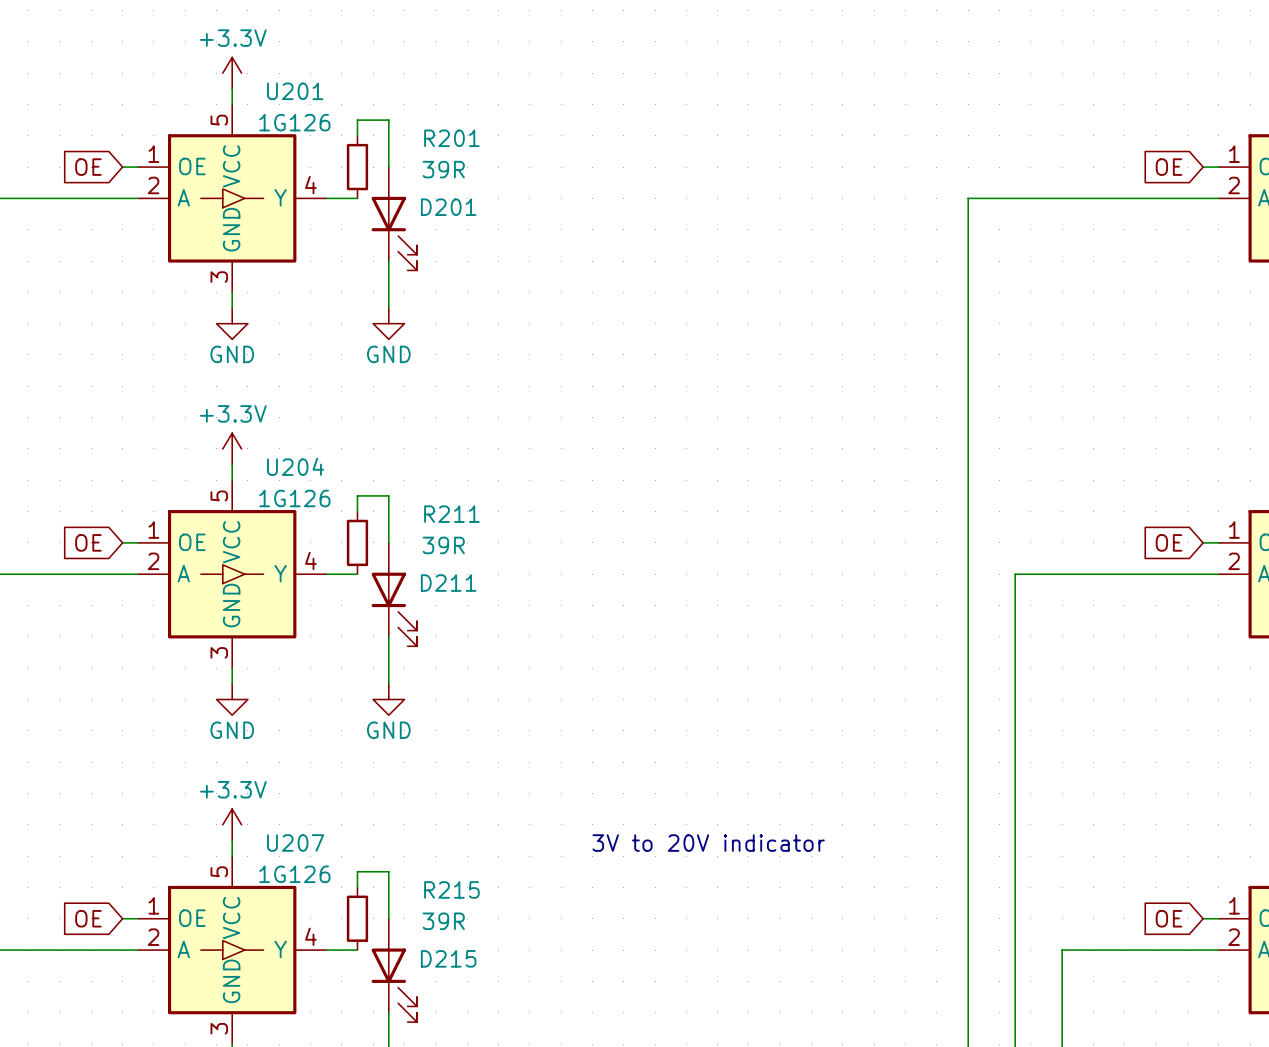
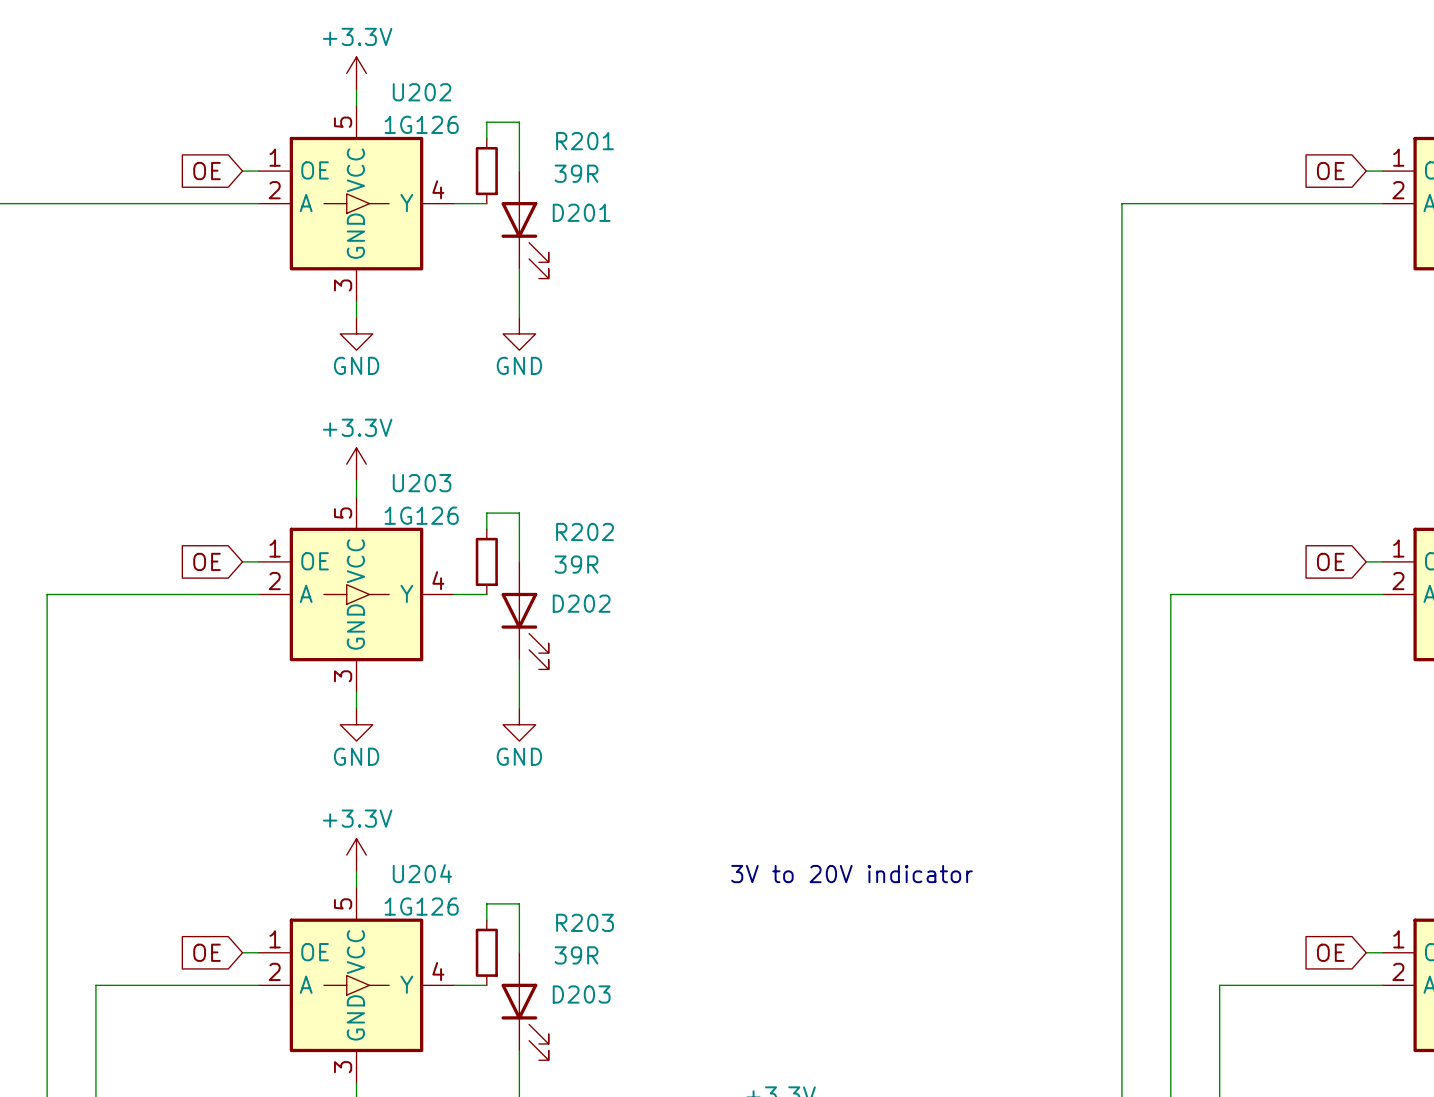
U201 name: U201 (295, 91) -> U202 (422, 92)
U204 name: U204 (295, 466) -> U203 (422, 483)
R211 name: R211 (451, 514) -> R202 (585, 532)
D211 name: D211 (448, 583) -> D202 (581, 603)
U207 name: U207 (295, 842) -> U204 (422, 873)
R215 name: R215 (451, 889) -> R203 (585, 922)
D215 name: D215 (448, 958) -> D203 (581, 994)

